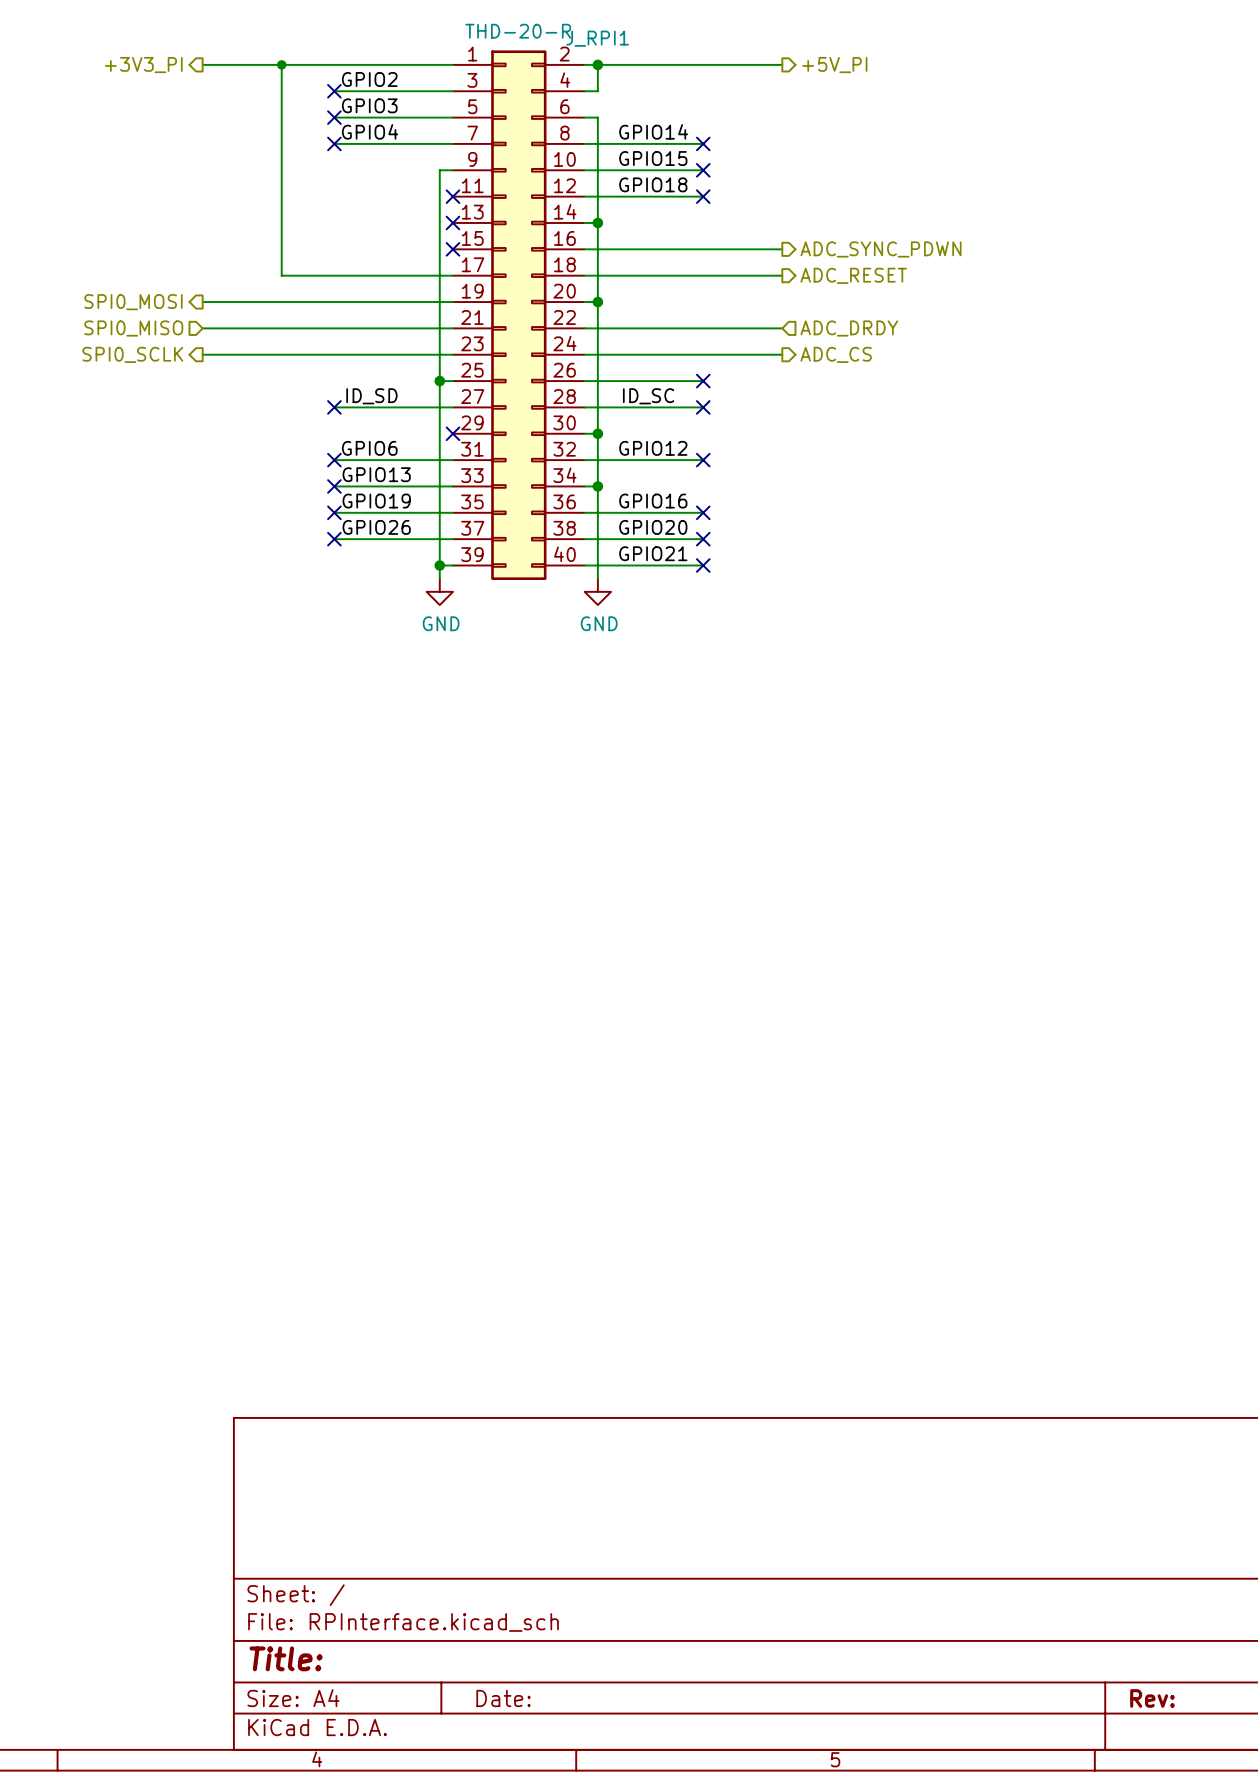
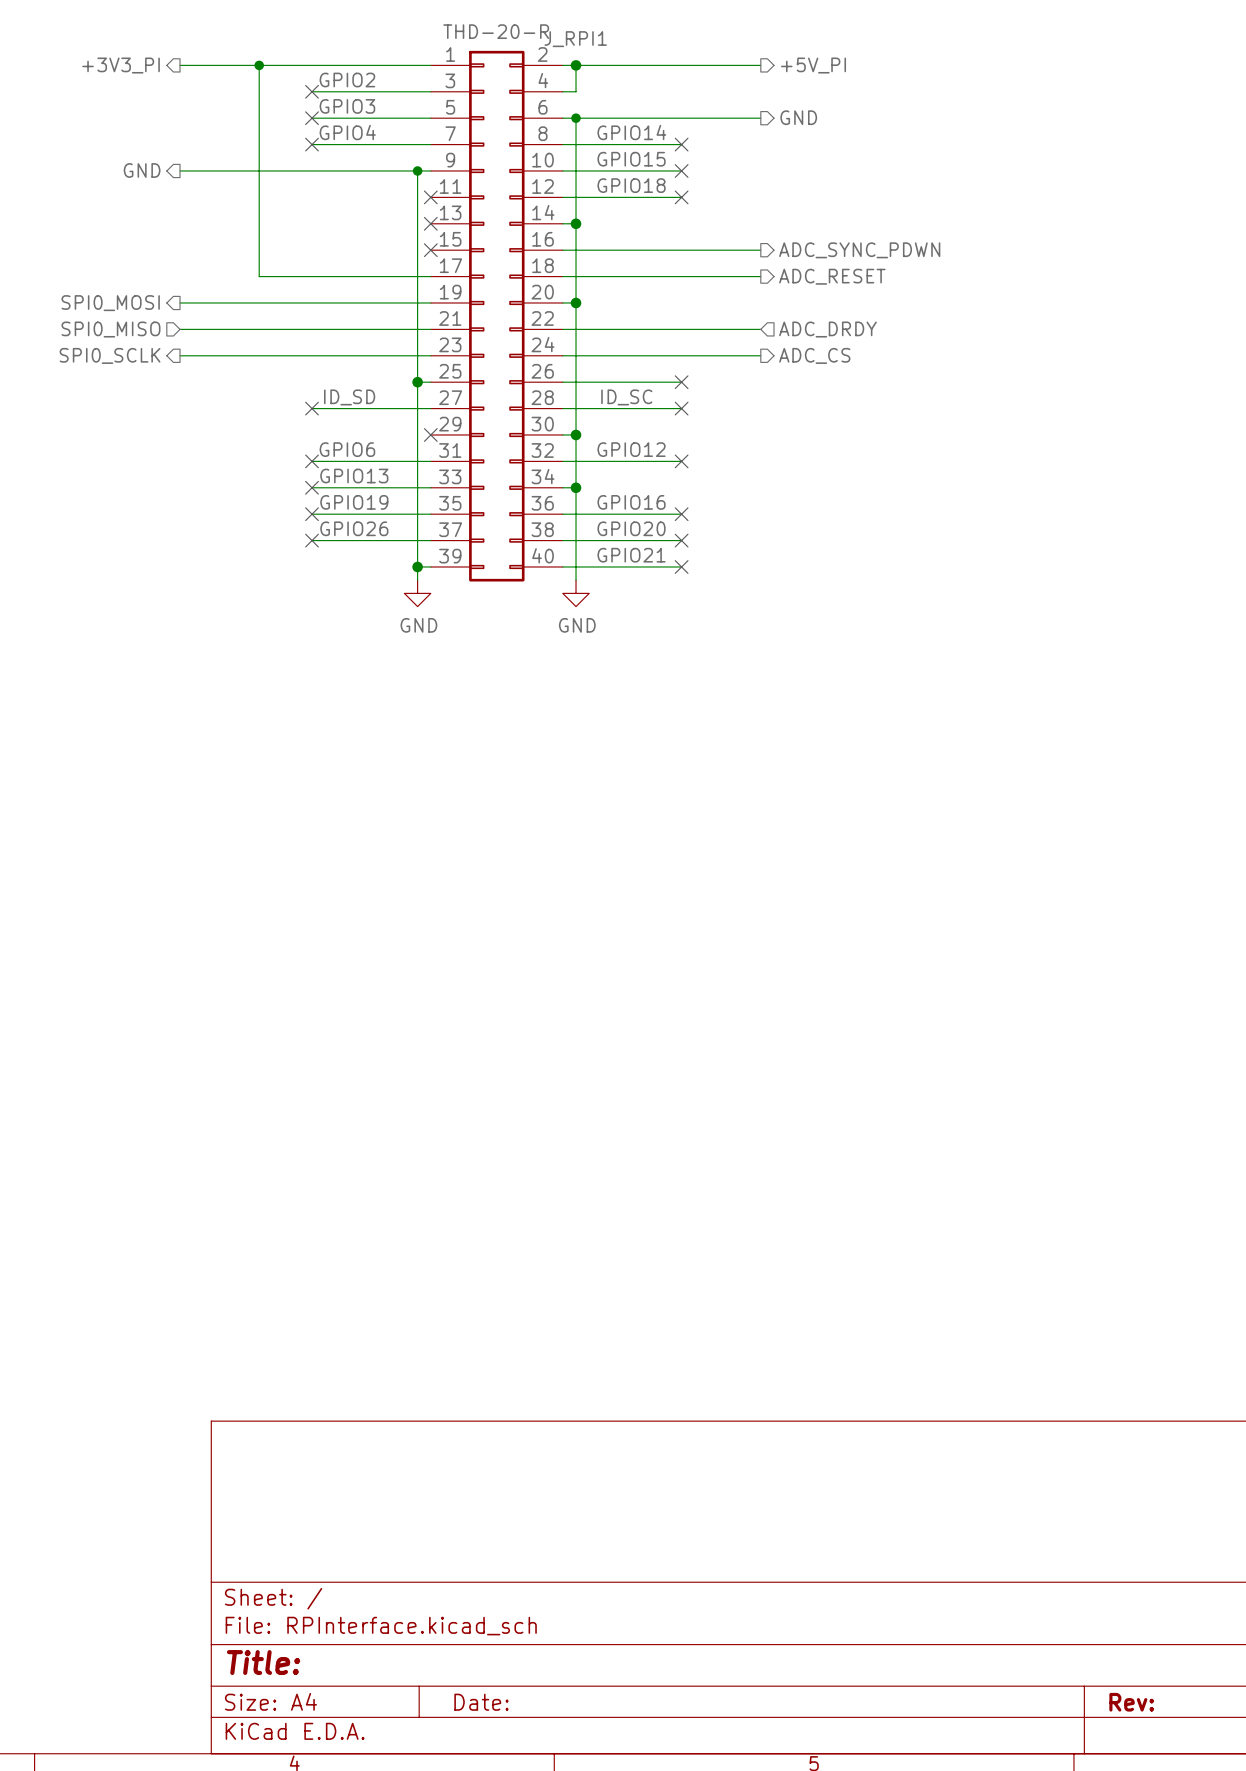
wire: none -> (576, 118) (760, 118)
junction: none -> (576, 118)
hierarchical label: none -> GND (798, 117)
hierarchical label: none -> GND (142, 170)
wire: none -> (180, 170) (417, 170)
junction: none -> (417, 170)

